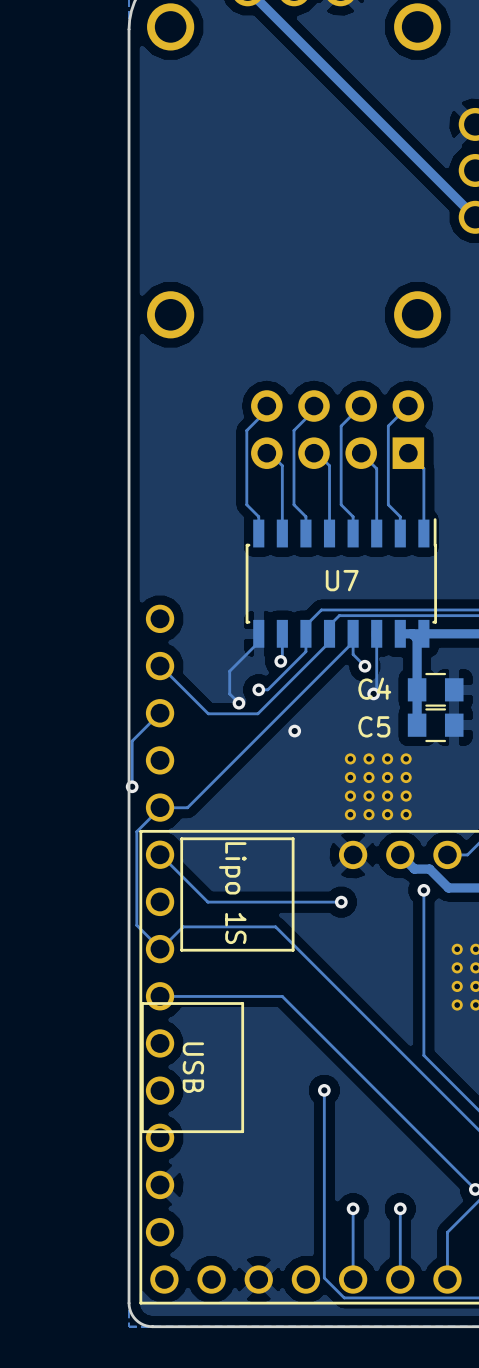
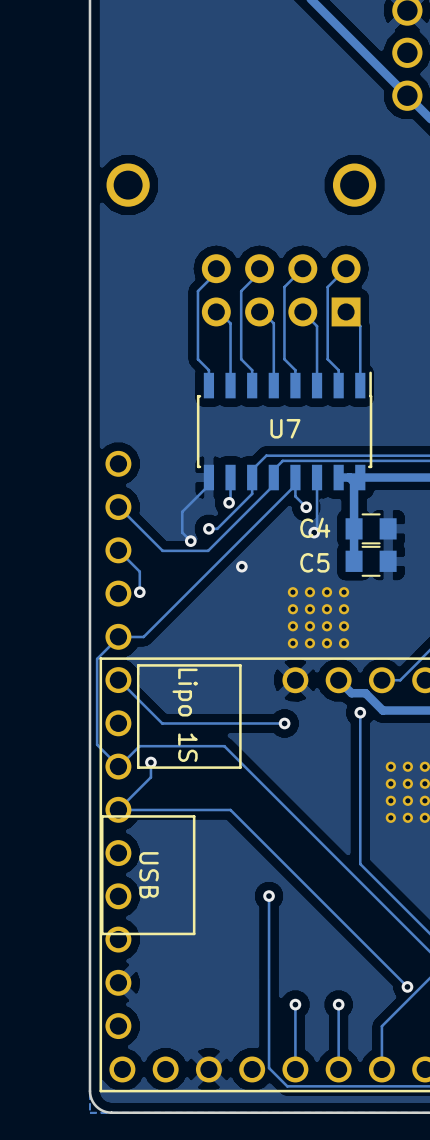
track: (160, 713) (132, 741) (132, 786) -> (118, 550) (139, 571) (139, 592)
via position: (132, 786) -> (139, 592)
track: none -> (150, 762) (150, 777) (118, 809)
via: none -> (150, 762)

